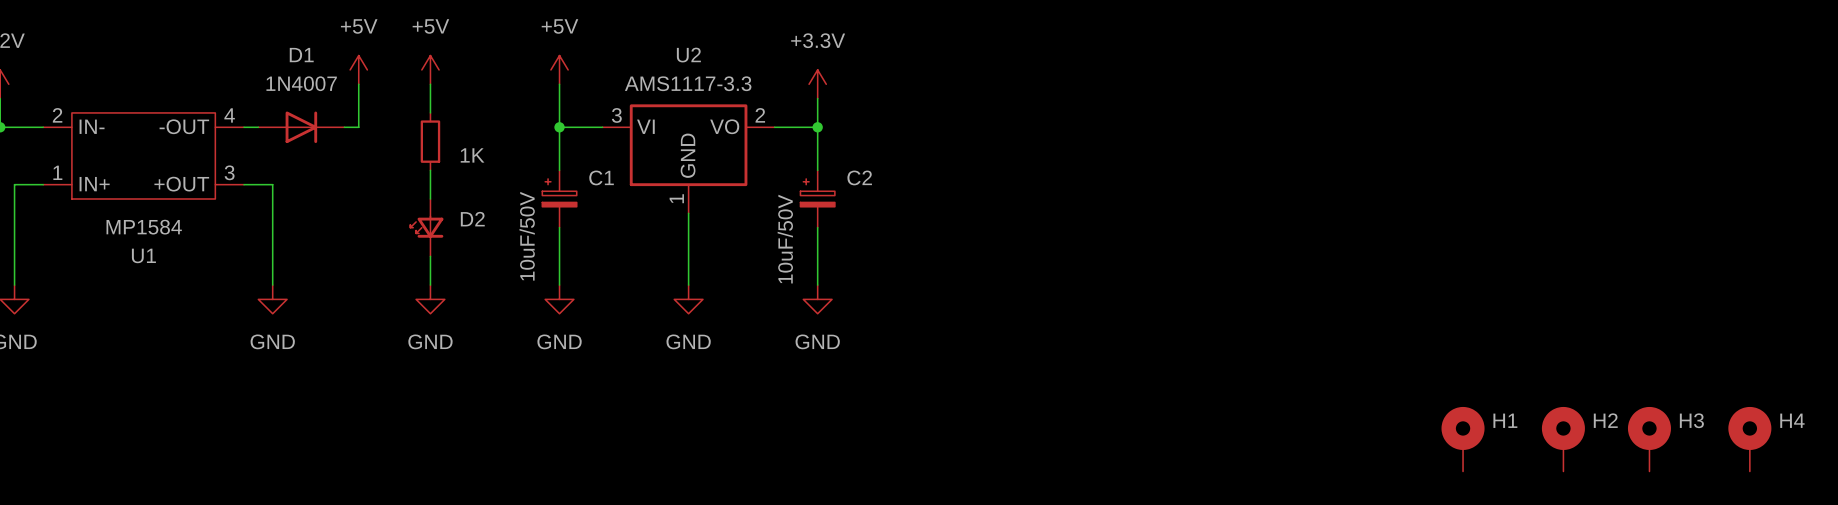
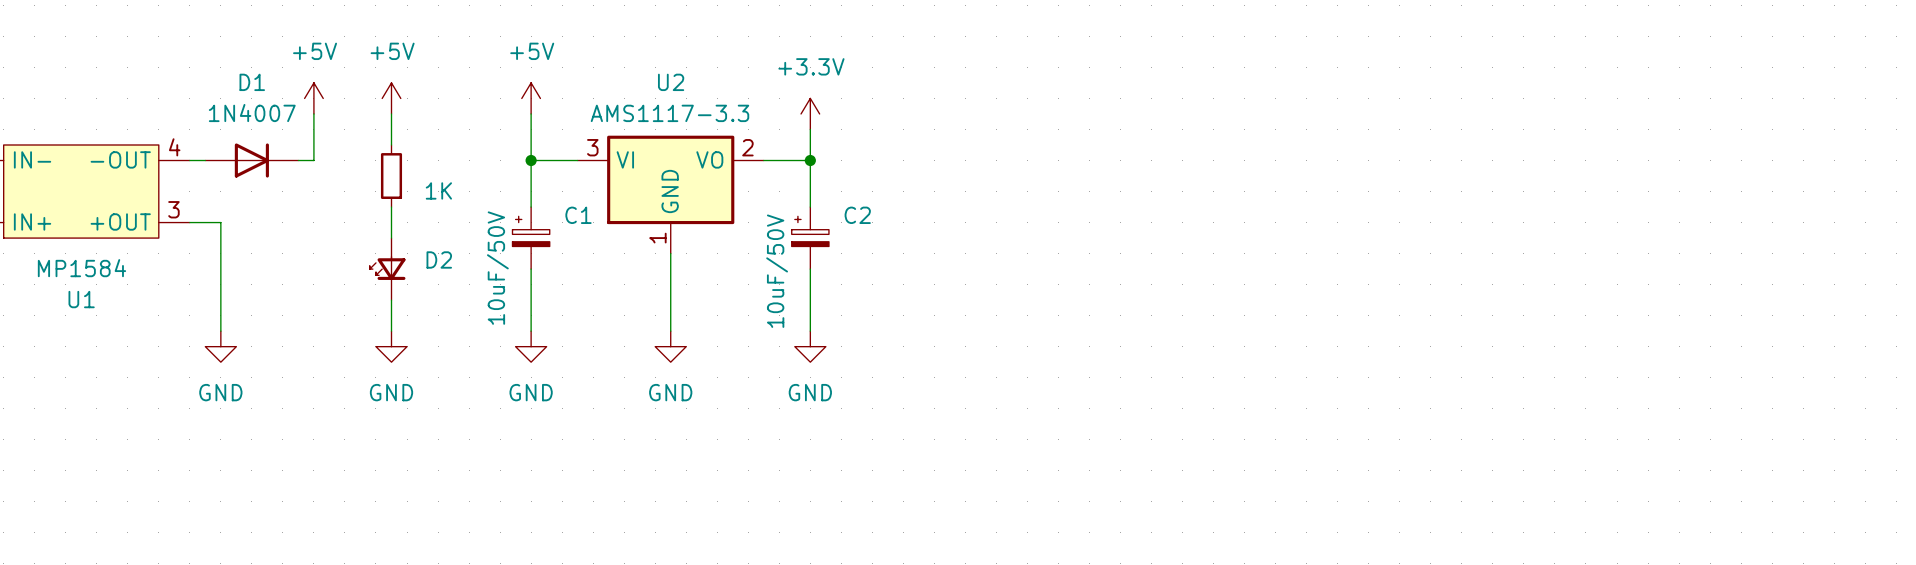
H1: (1463, 439) -> none
H2: (1563, 439) -> none
H3: (1649, 439) -> none
H4: (1749, 439) -> none

